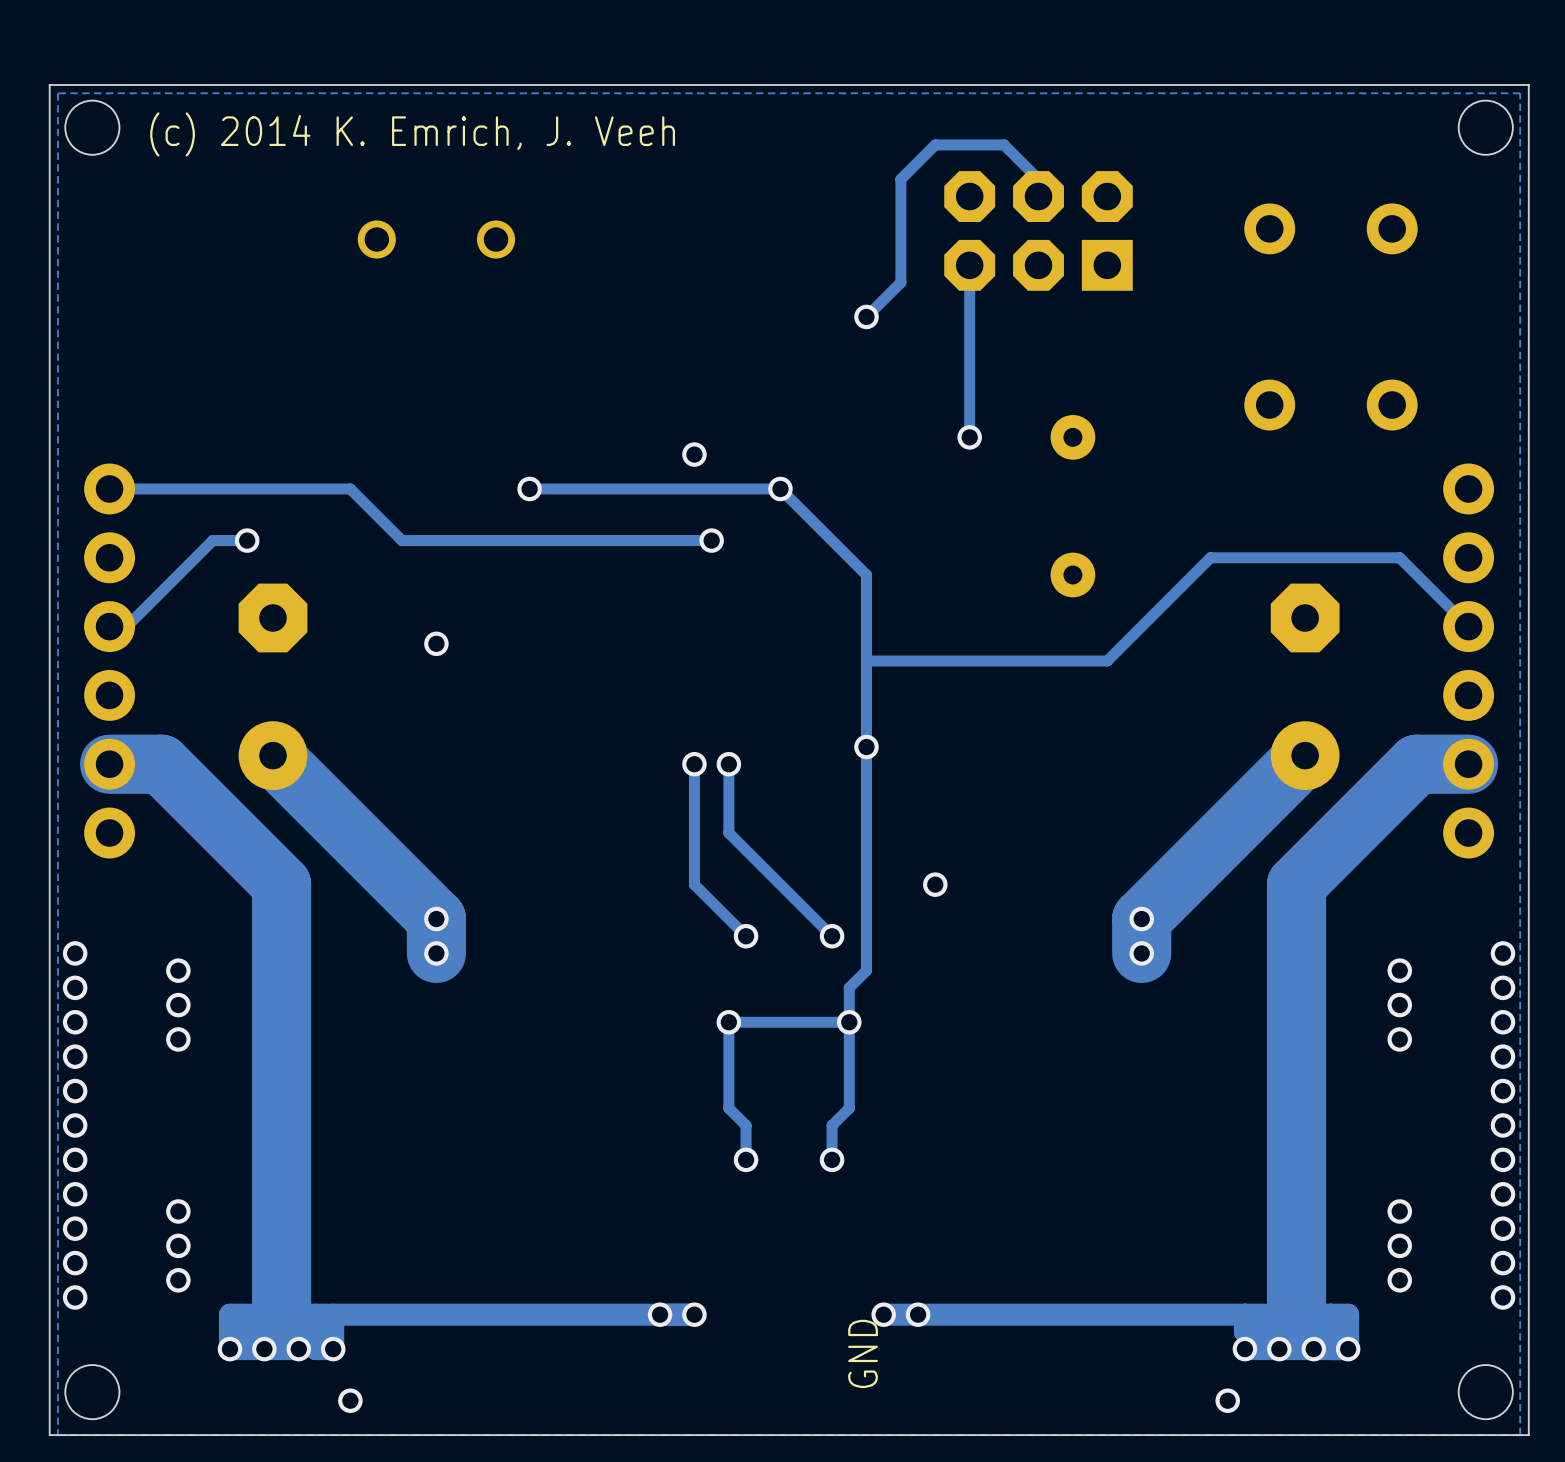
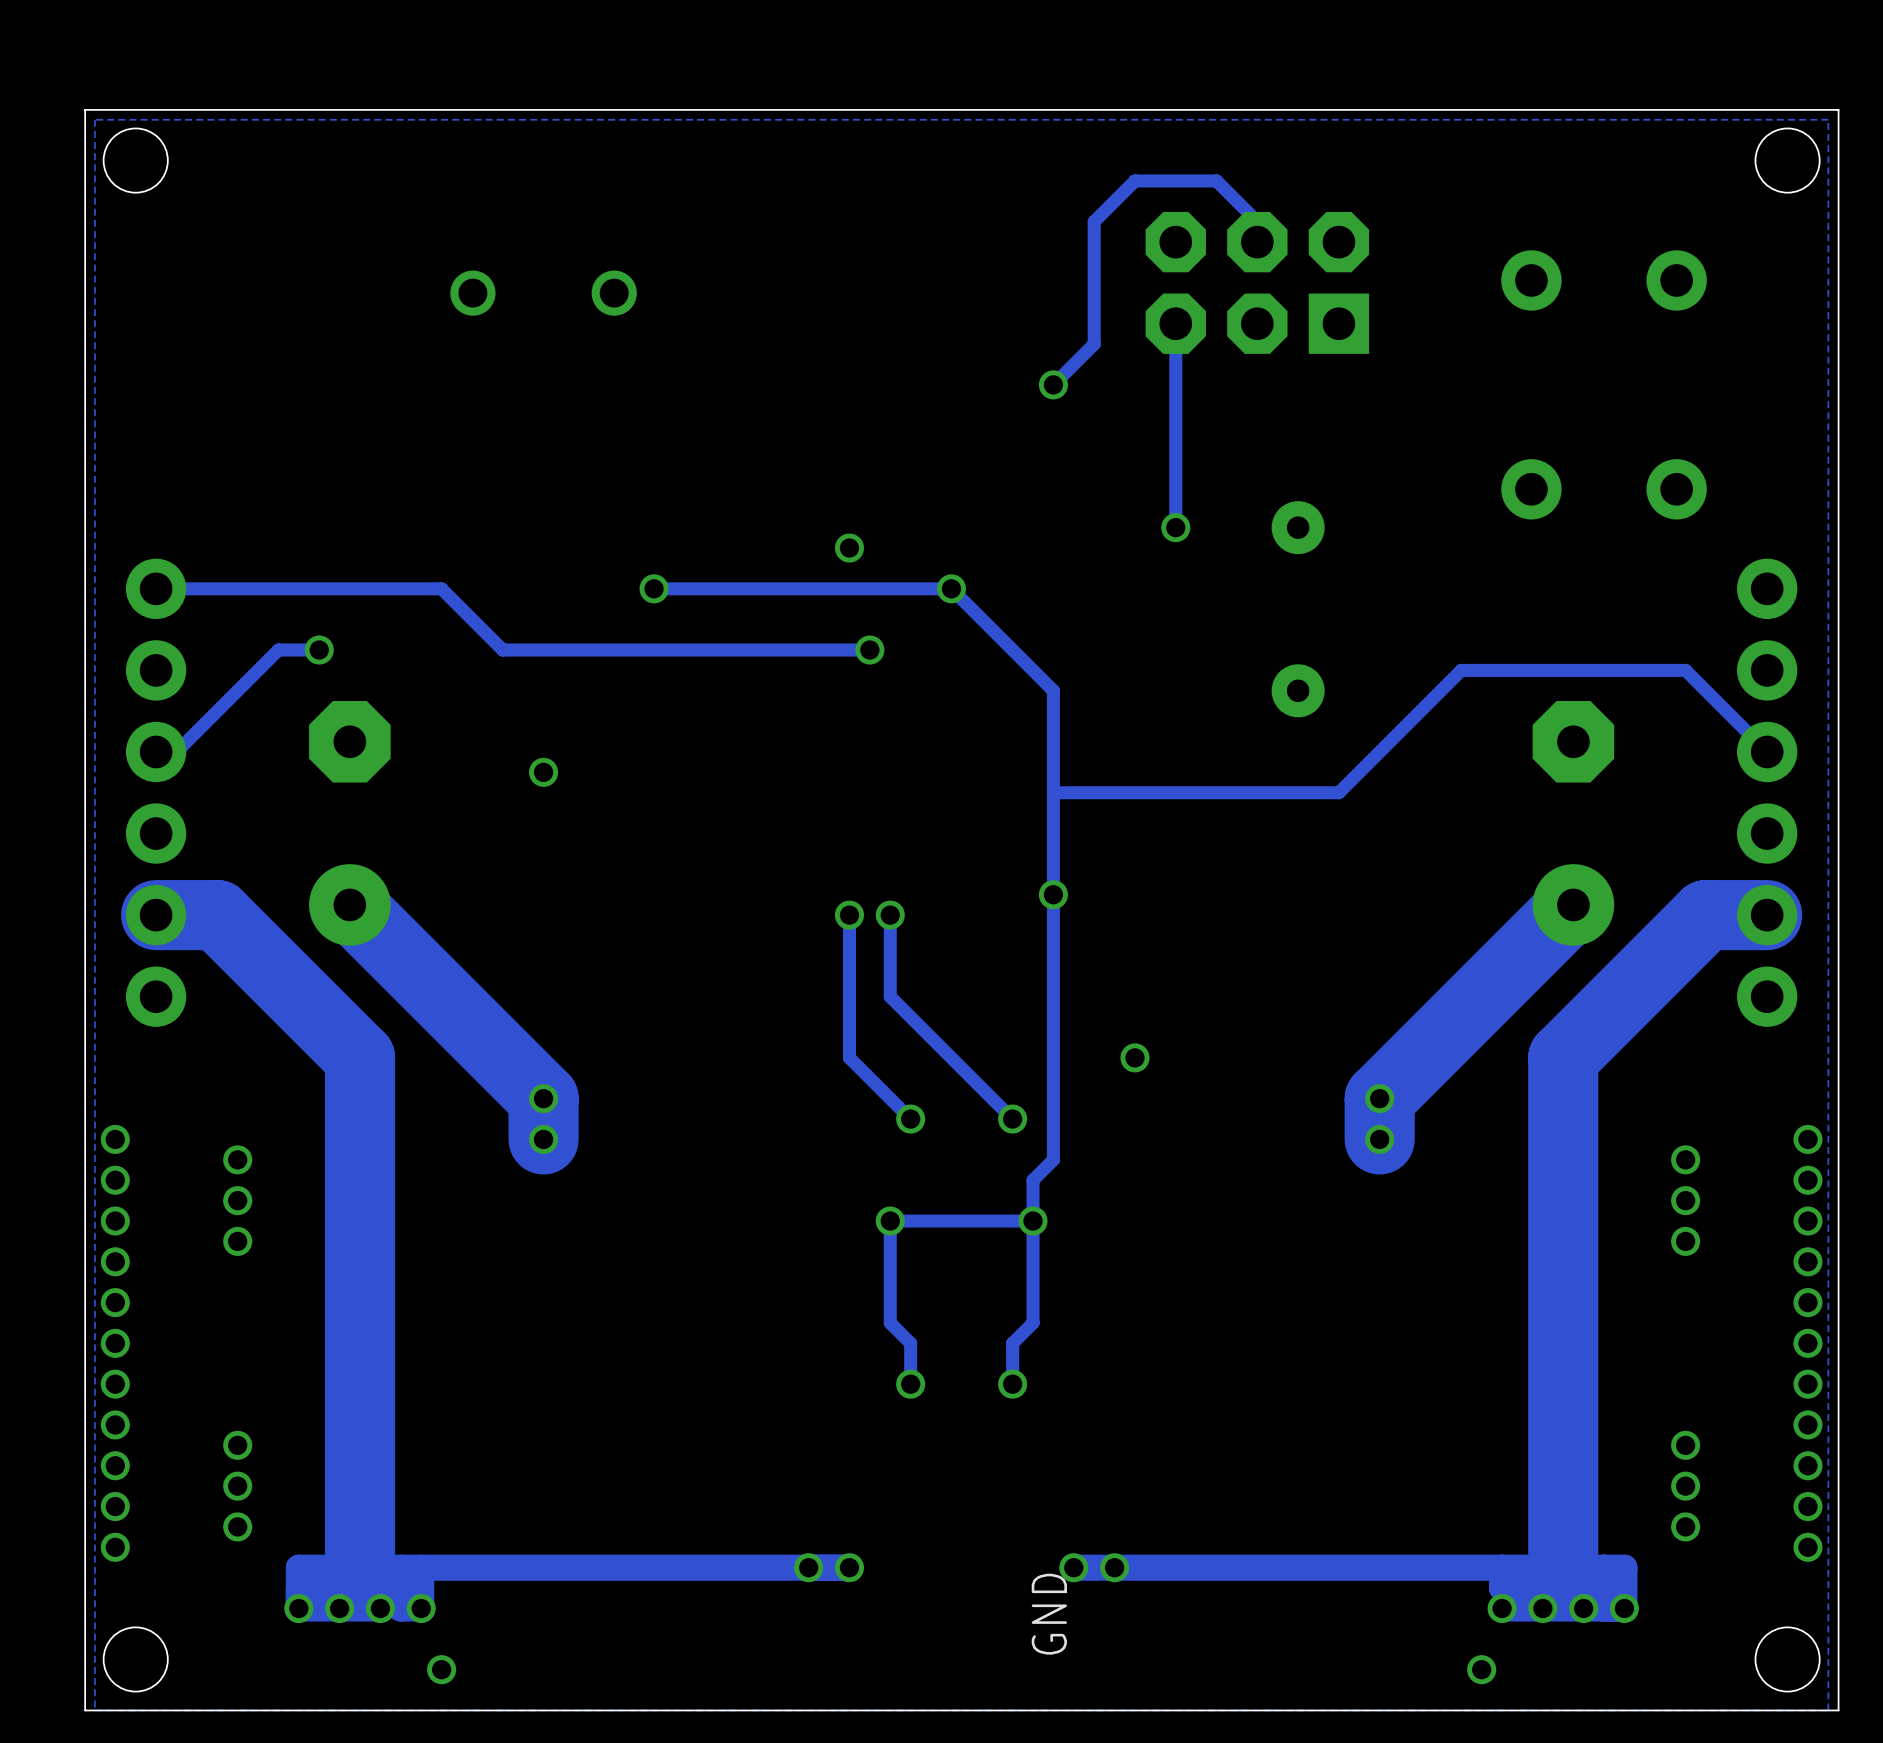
text: (c) 2014 K. Emrich, J. Veeh (412, 134) -> none

